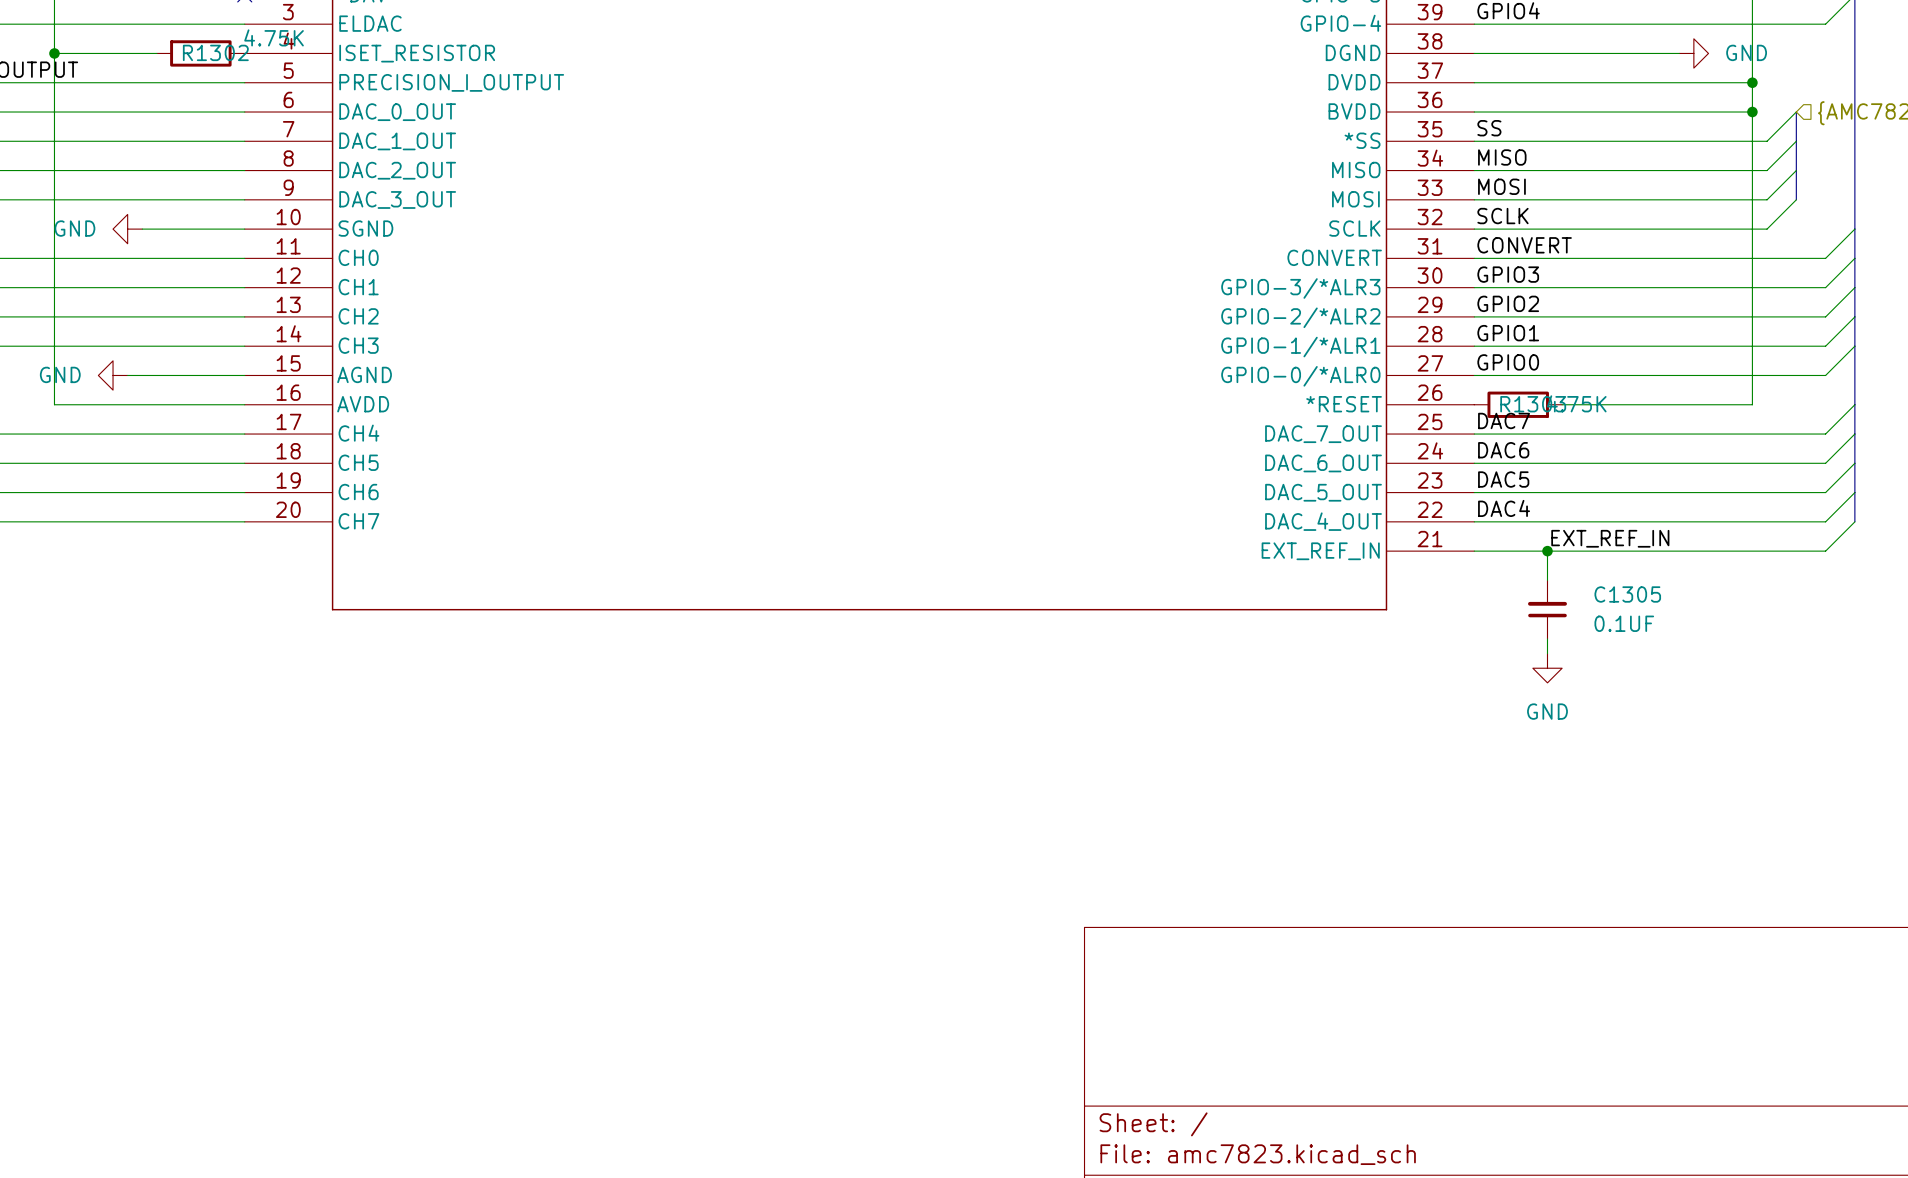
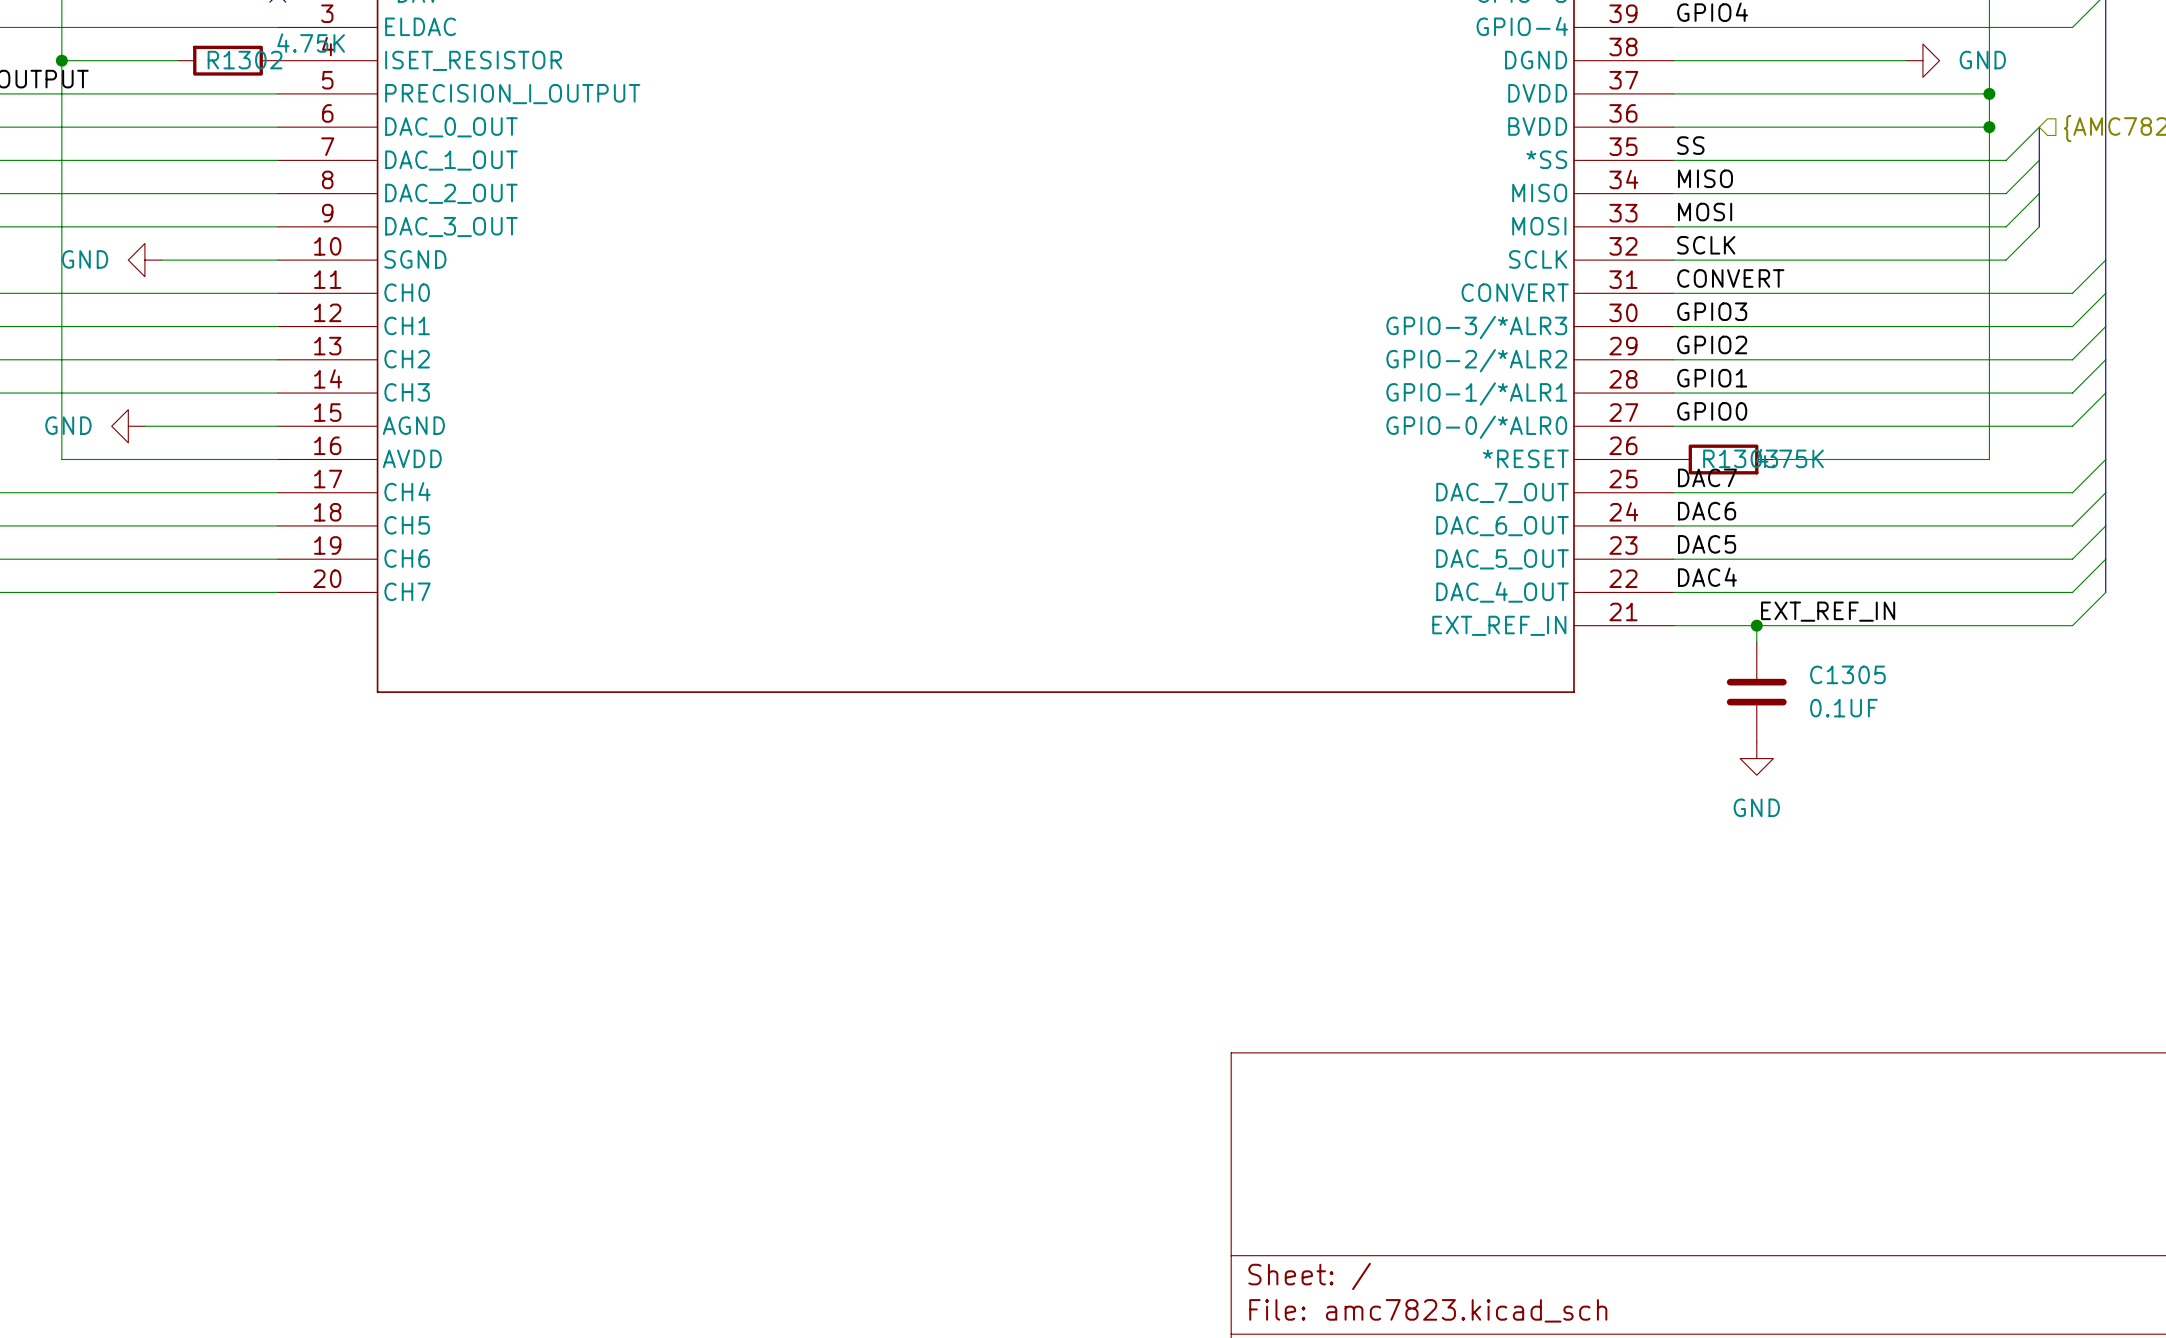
C1305 symbol: [1528, 580, 1567, 639] -> [1726, 642, 1787, 742]

